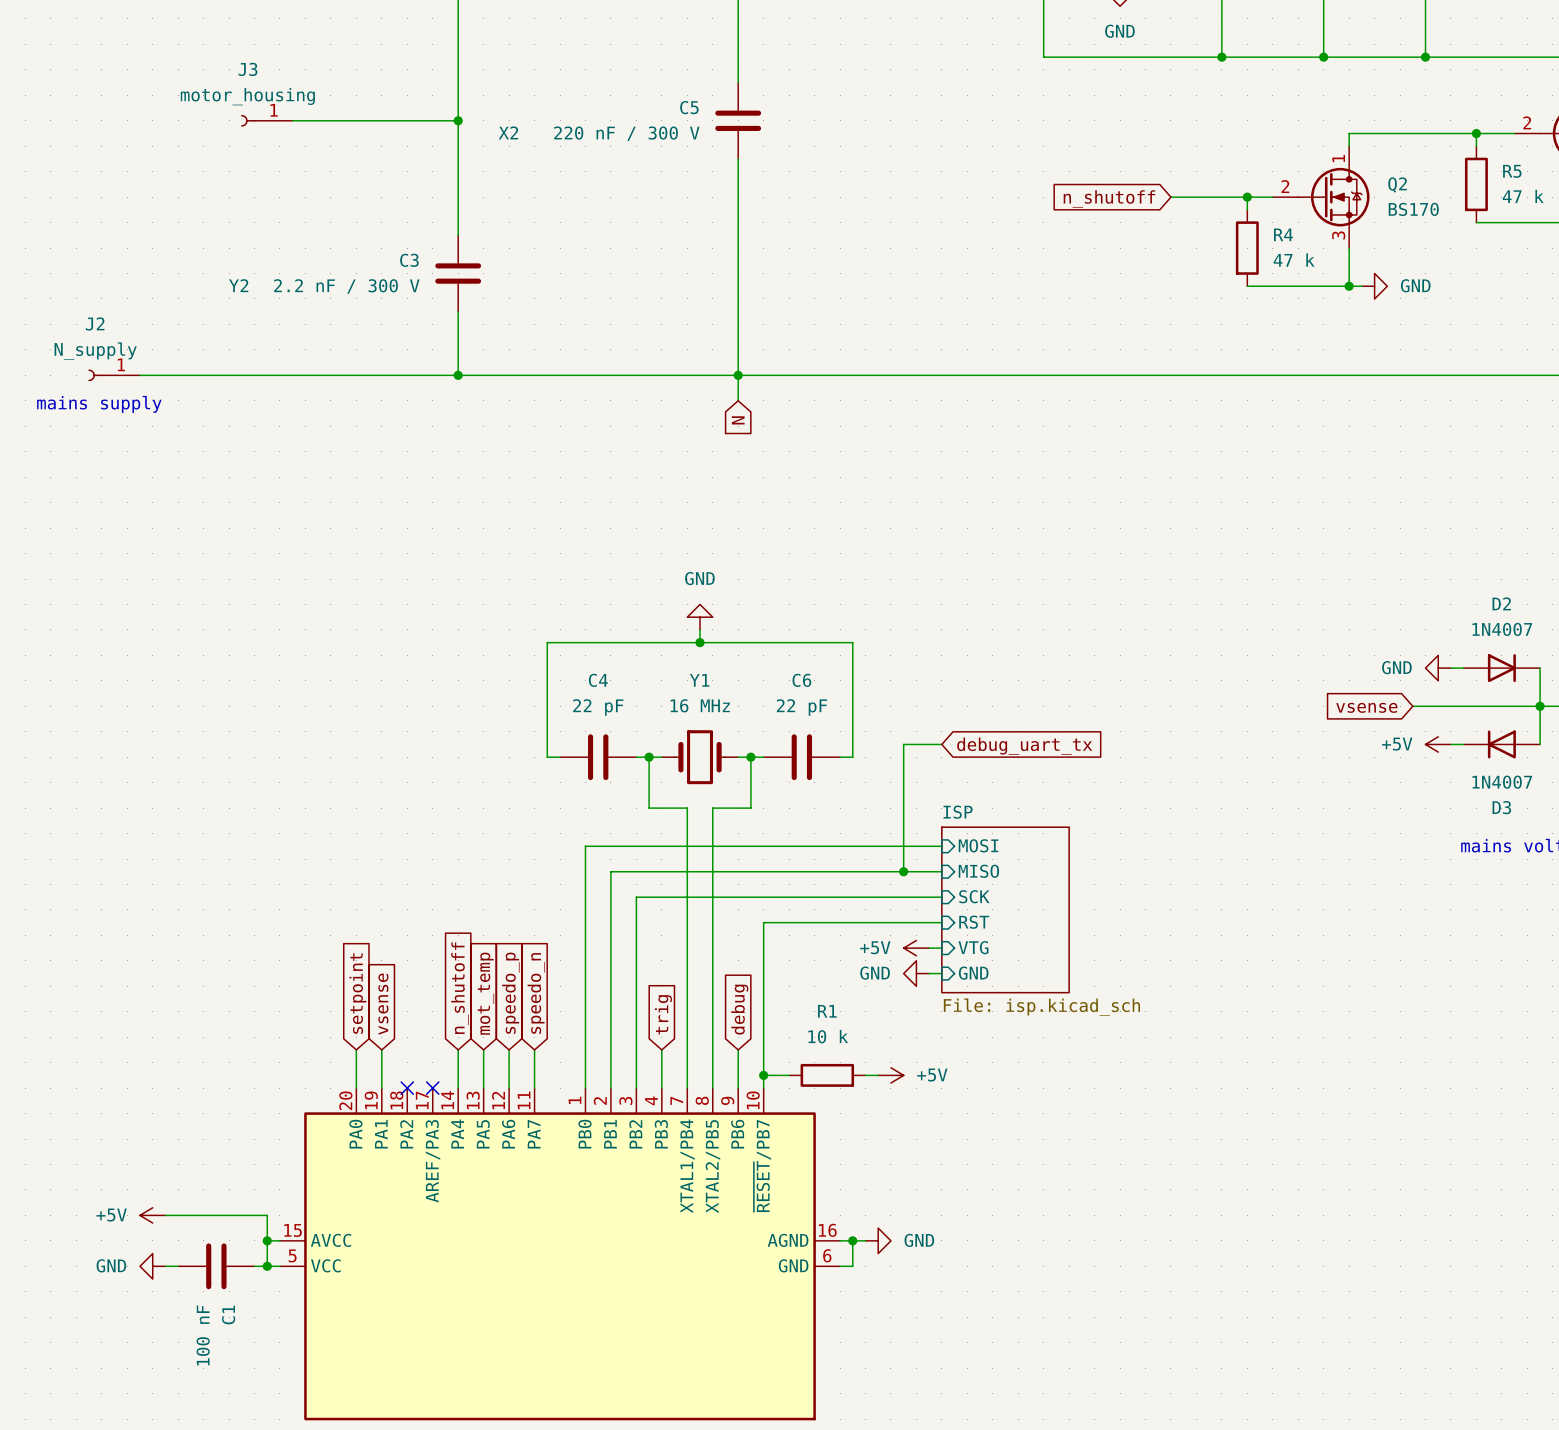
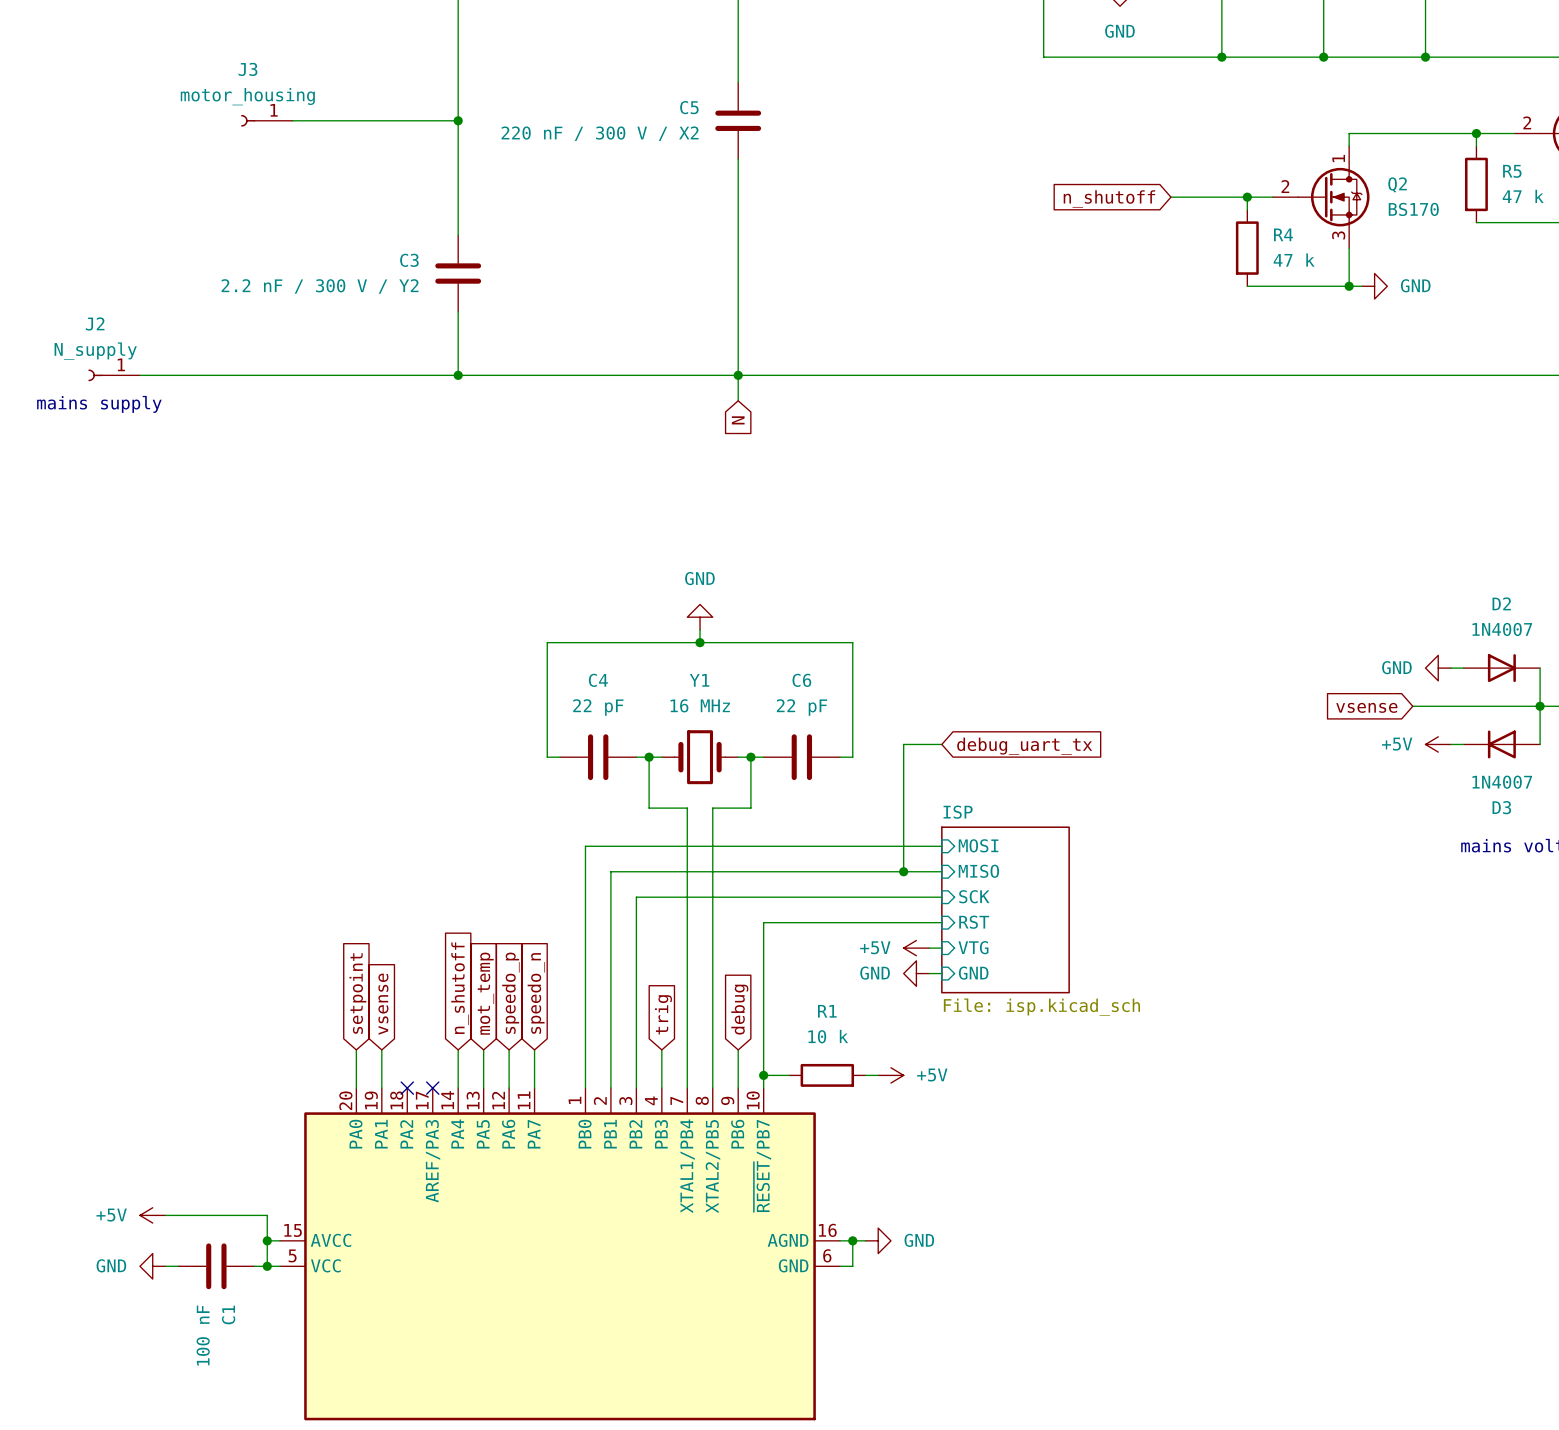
C5 text: X2 (508, 132) -> none
C5 value: 220 nF / 300 V (626, 133) -> 220 nF / 300 V / X2 (600, 133)
C3 text: Y2 (238, 285) -> none
C3 value: 2.2 nF / 300 V (346, 286) -> 2.2 nF / 300 V / Y2 (320, 286)

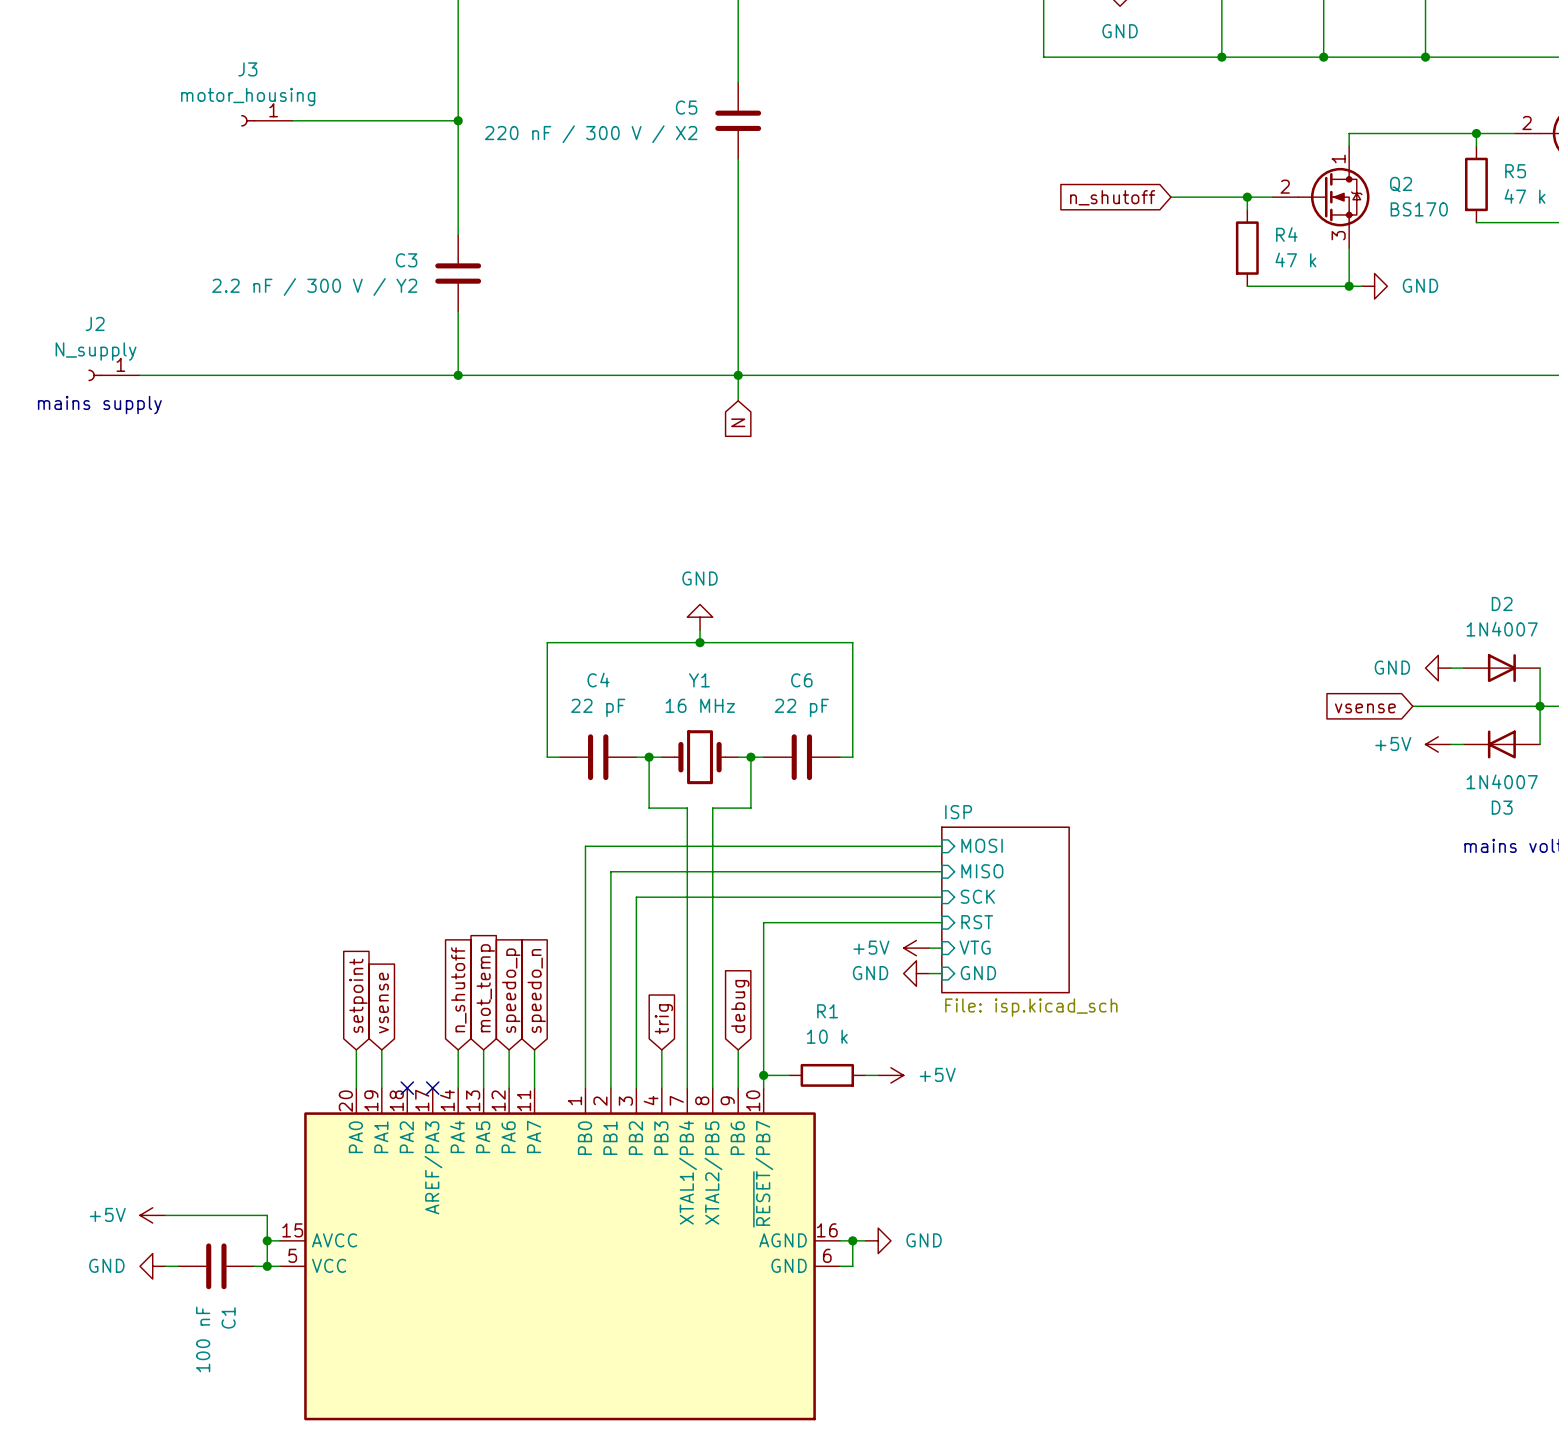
wire: (941, 744) (903, 744) (903, 871) -> none
global label: debug_uart_tx (1024, 746) -> none
junction: (903, 871) -> none

